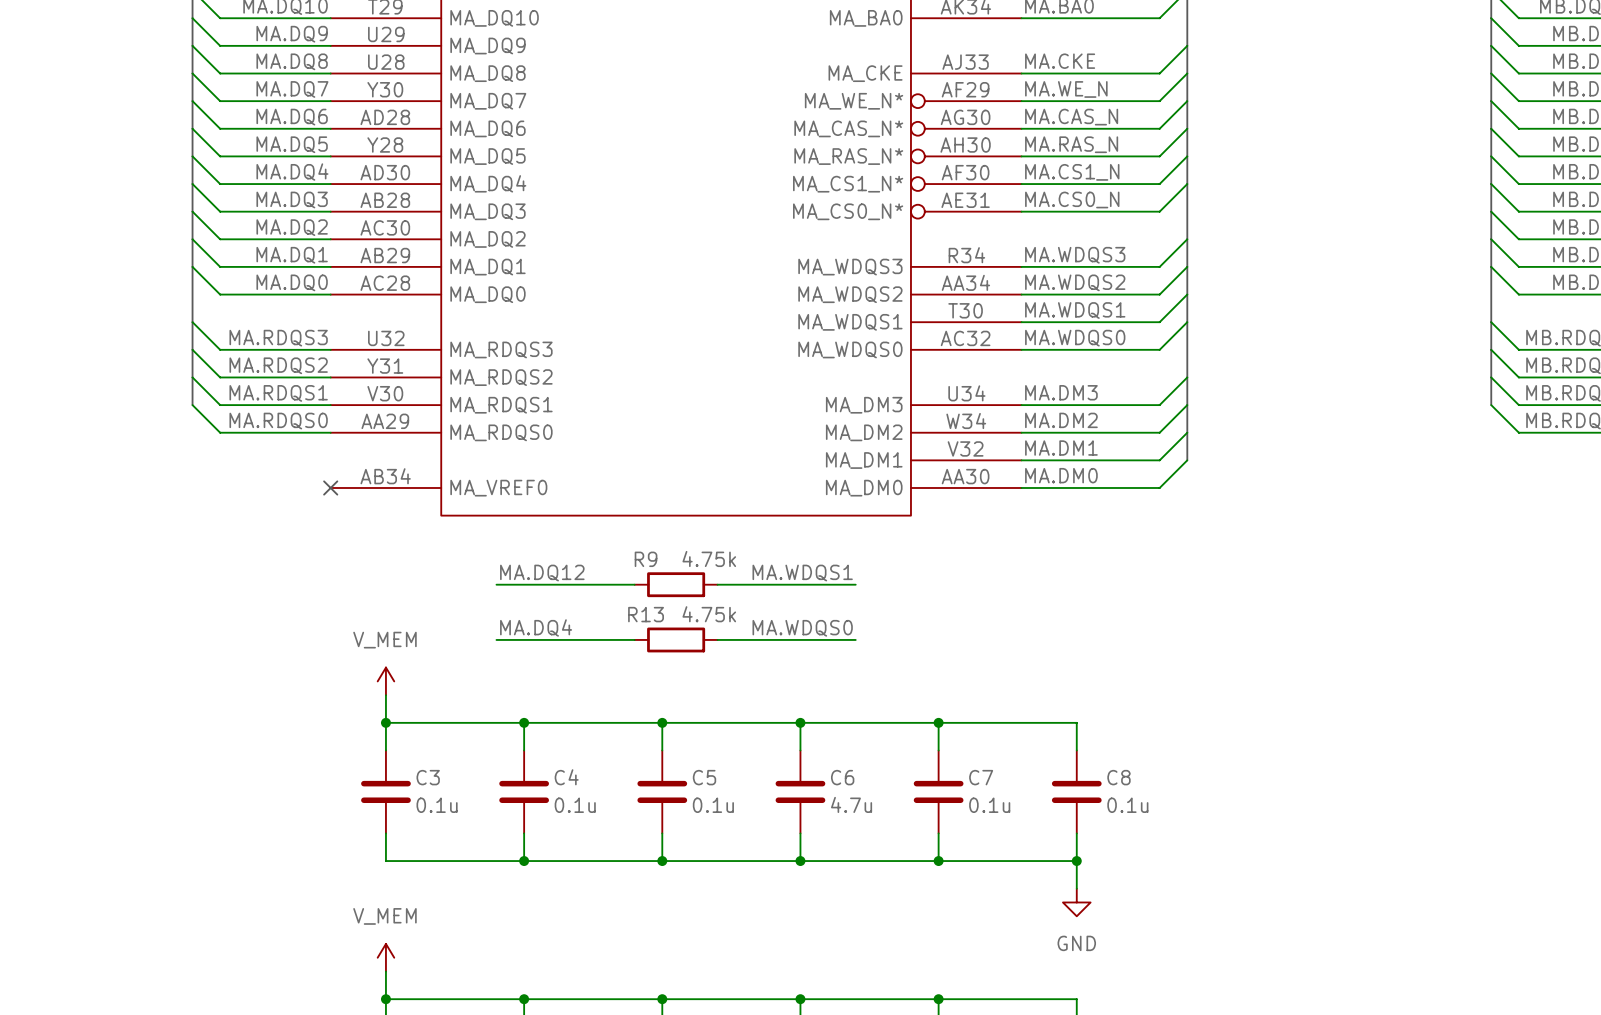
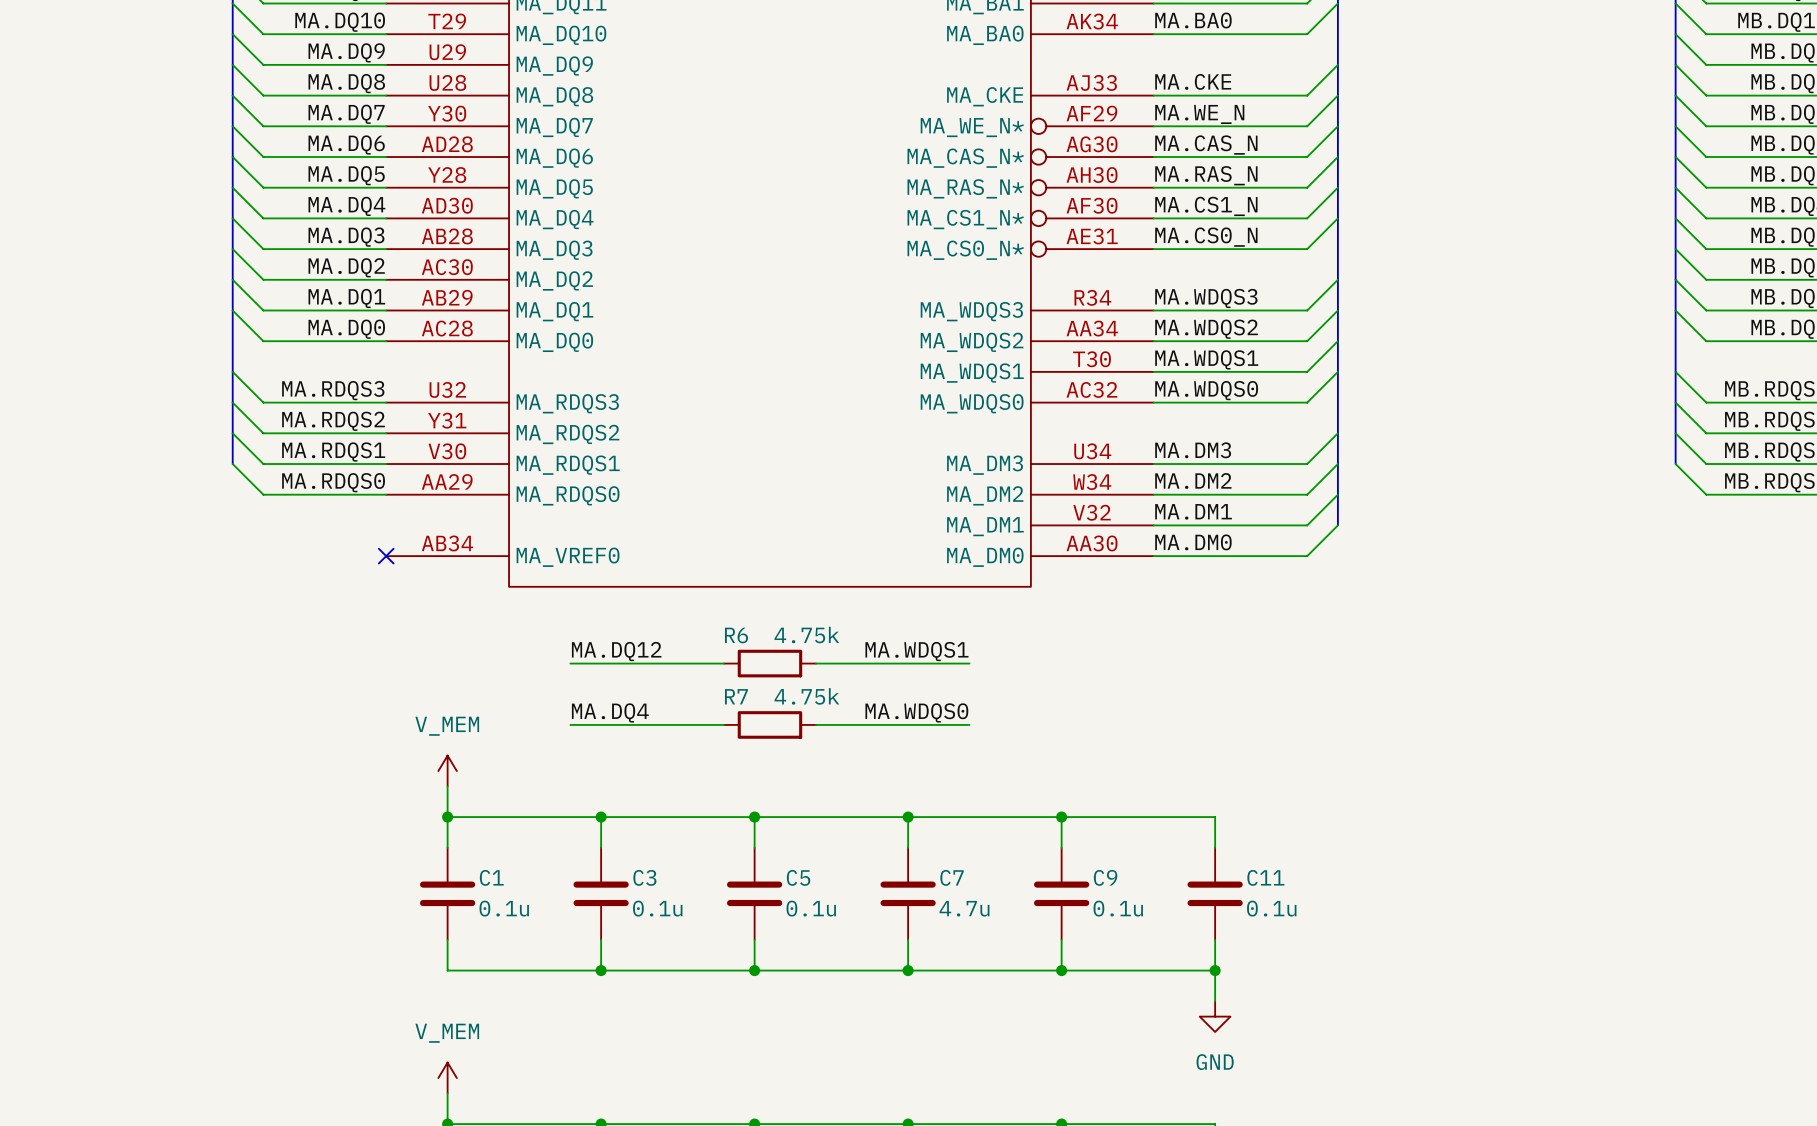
R9 name: R9 (646, 559) -> R6 (736, 635)
R13 name: R13 (646, 614) -> R7 (736, 696)
C3 name: C3 (428, 777) -> C1 (491, 877)
C4 name: C4 (566, 777) -> C3 (644, 877)
C6 name: C6 (842, 777) -> C7 (952, 877)
C7 name: C7 (981, 777) -> C9 (1105, 877)
C8 name: C8 (1118, 777) -> C11 (1265, 877)

